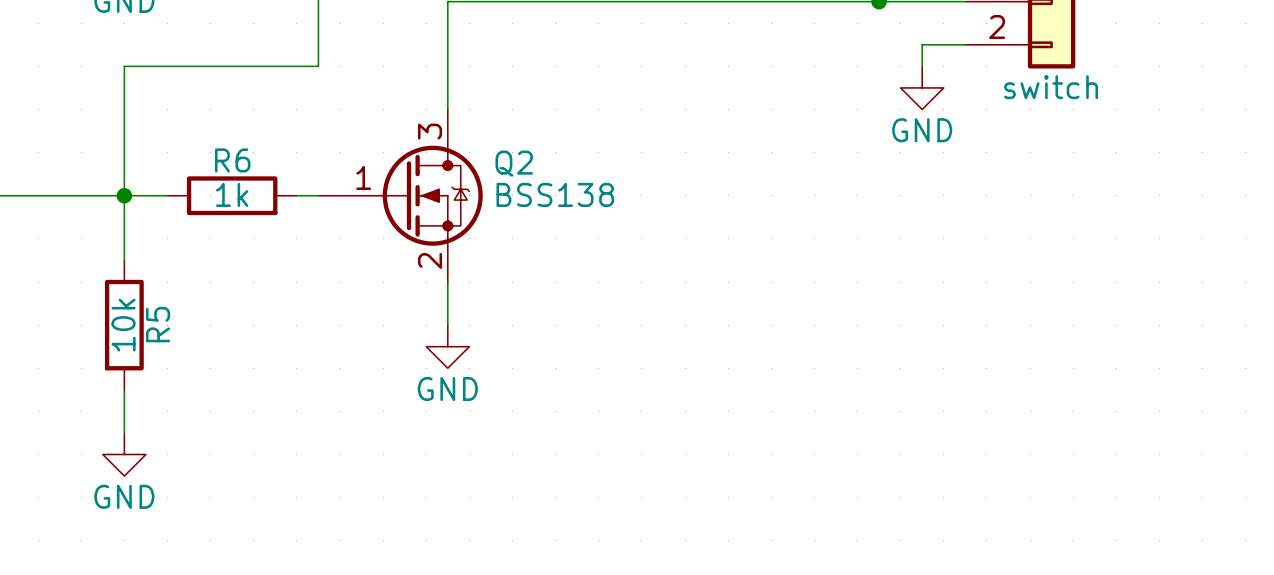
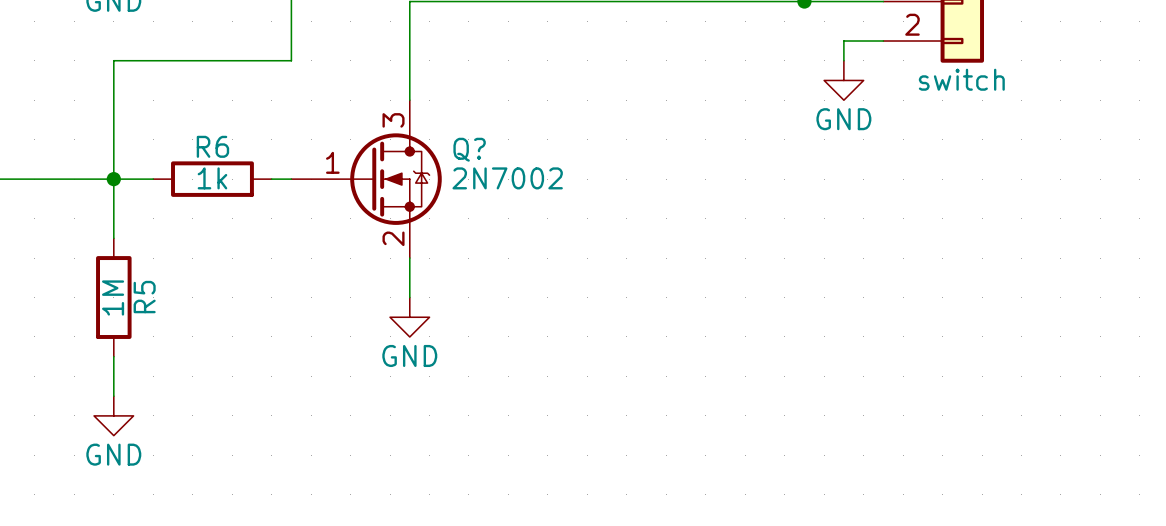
Q2 name: Q2 (514, 163) -> Q? (469, 149)
Q2 value: BSS138 (555, 194) -> 2N7002 (507, 178)
R5 value: 10k (123, 325) -> 1M (113, 297)

